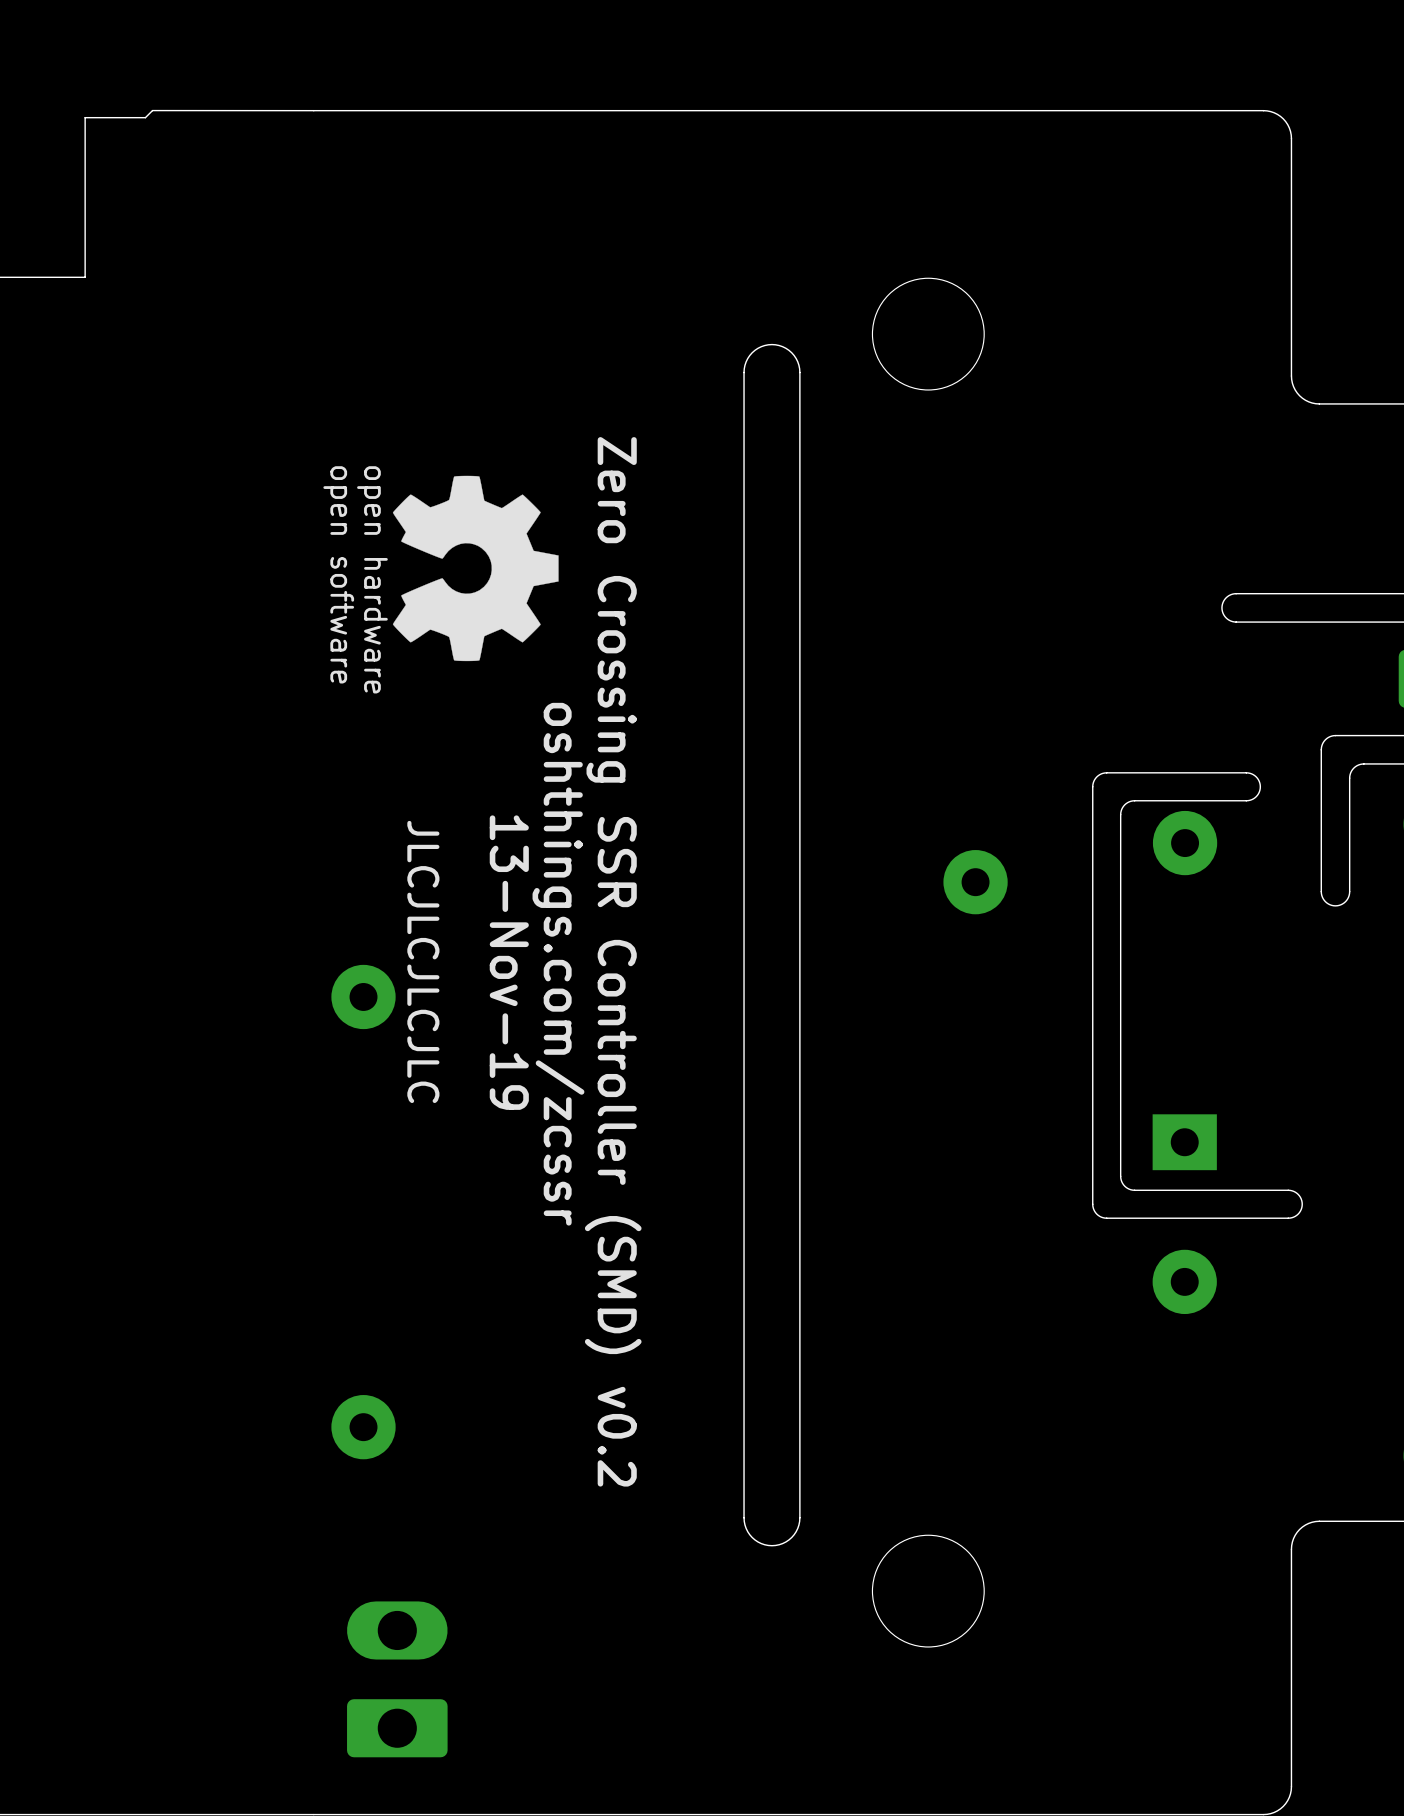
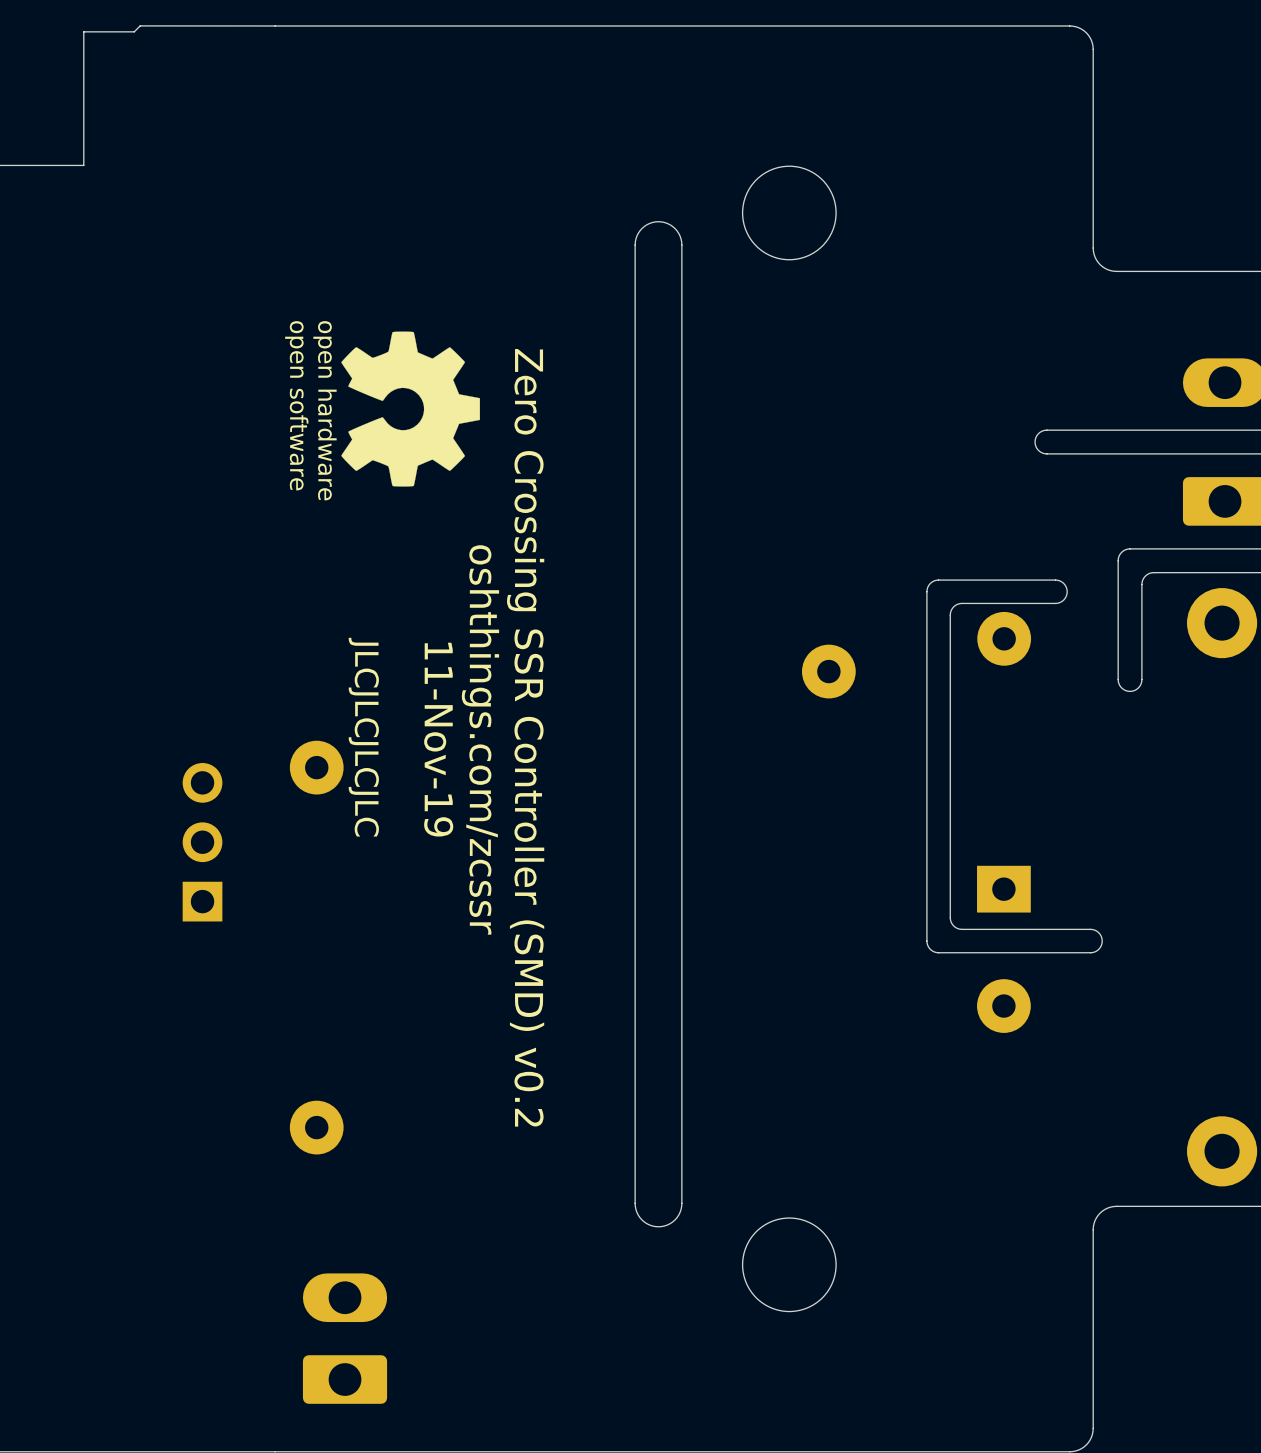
text: 13-Nov-19 (509, 962) -> 11-Nov-19 (438, 739)
part: none -> (202, 842)

